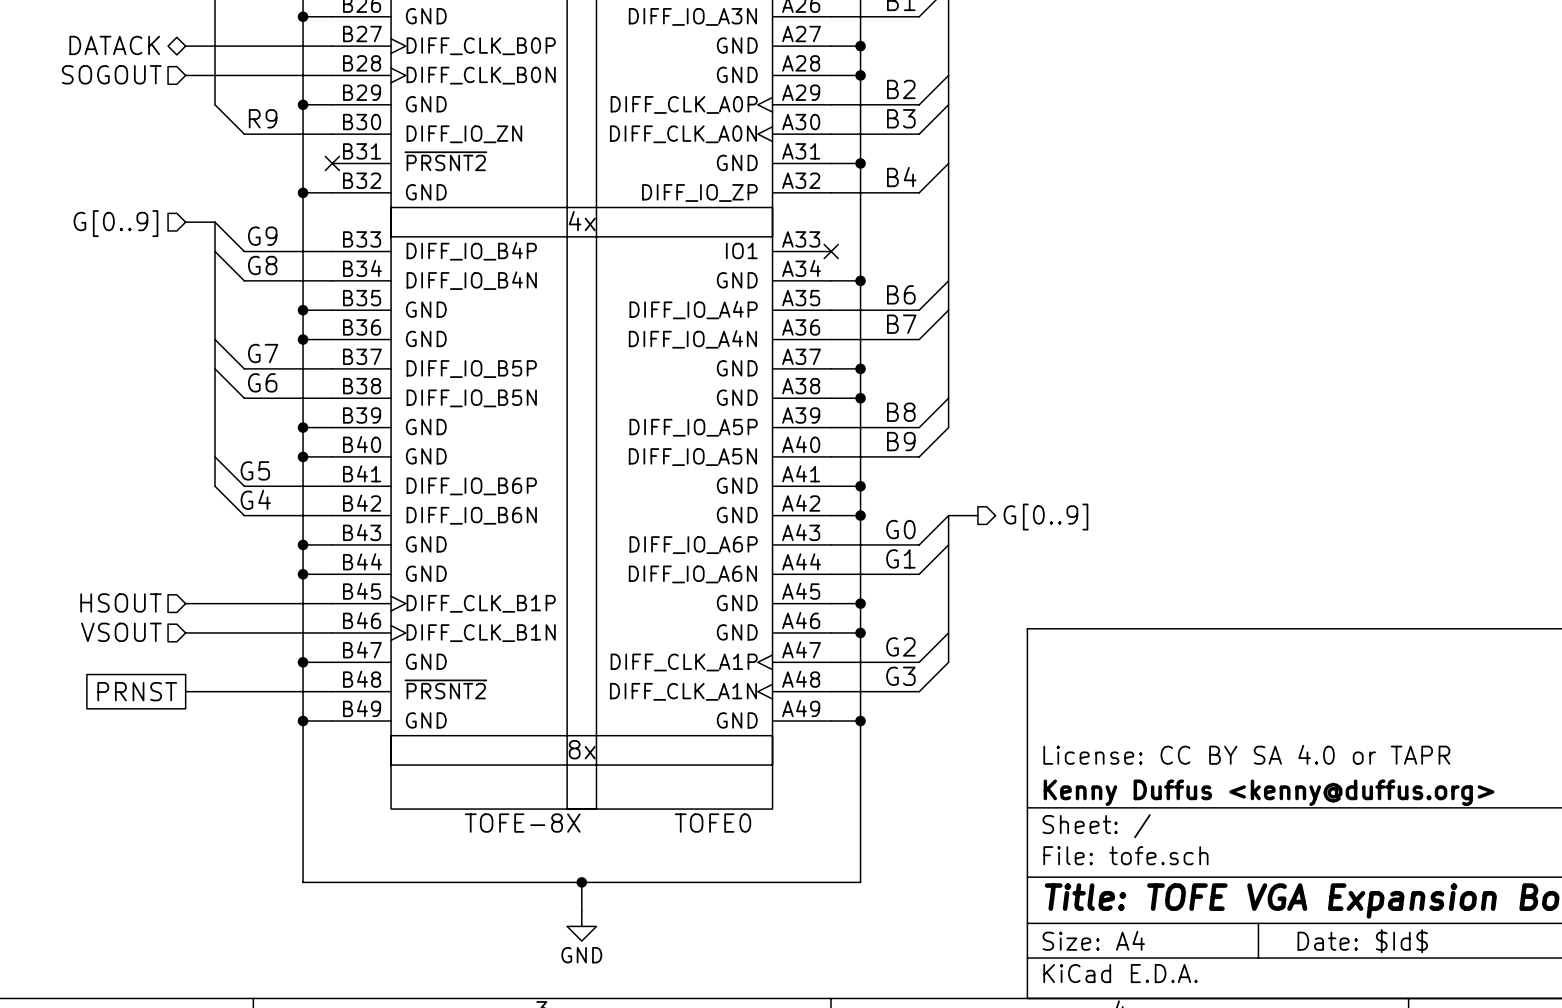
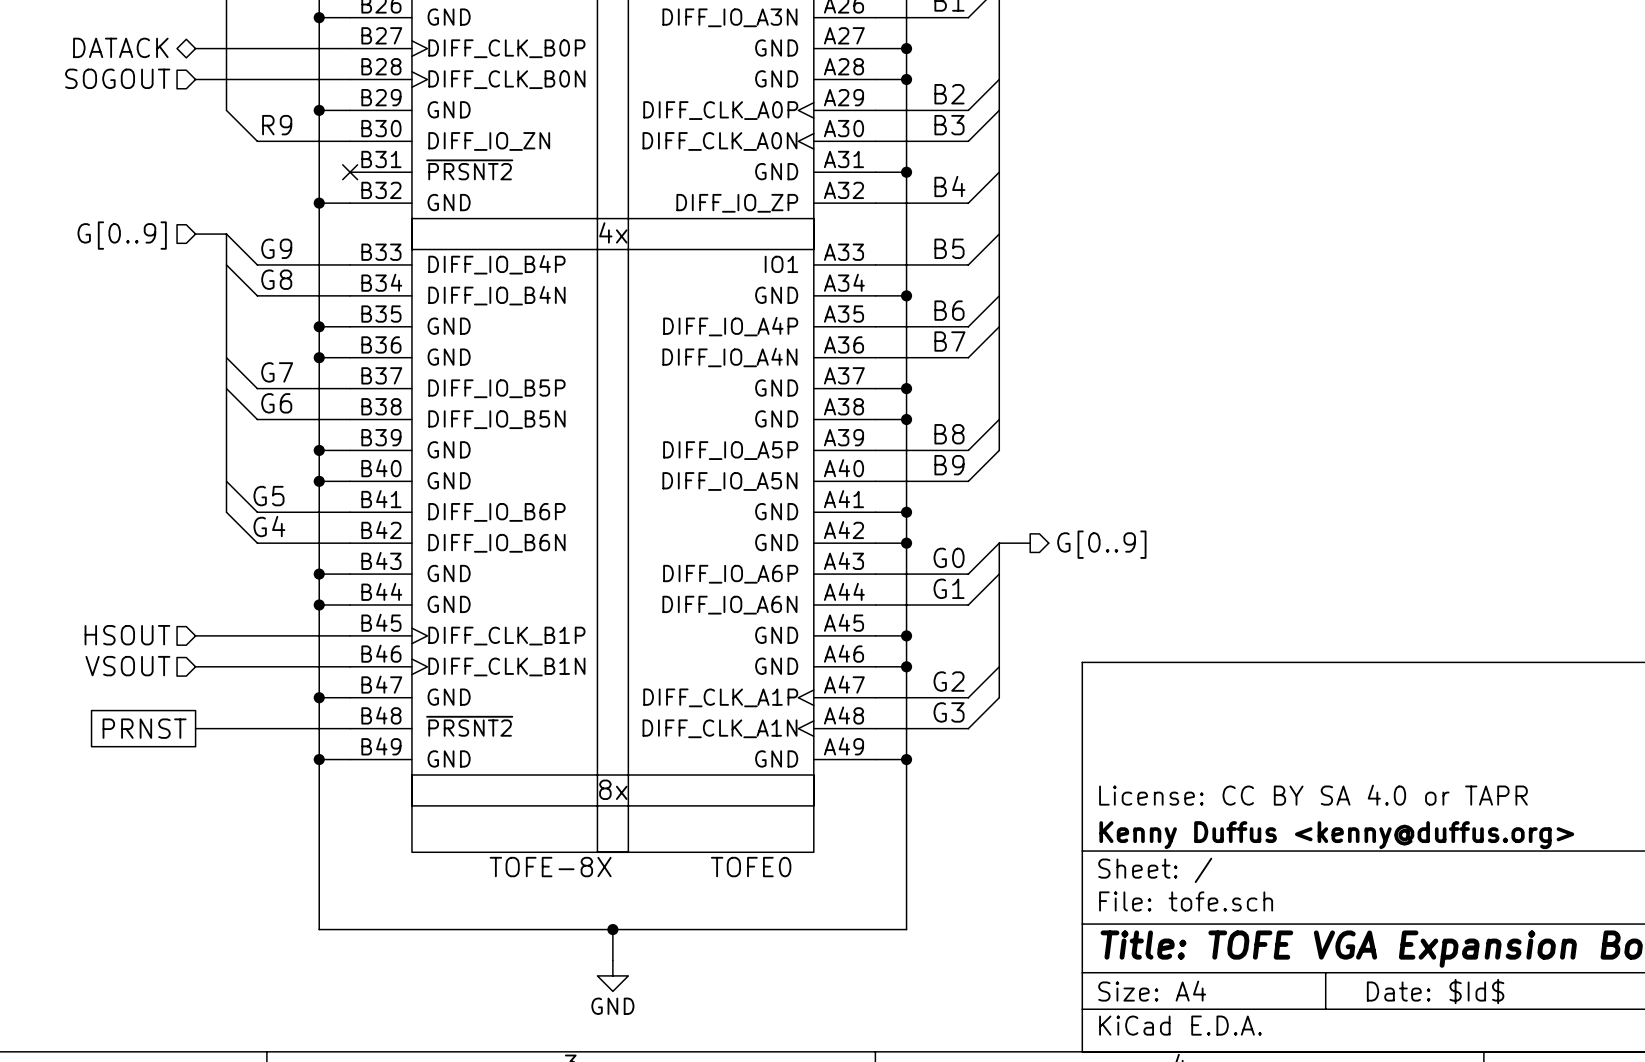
wire: none -> (999, 234) (968, 264) (875, 264)
label: none -> B5 (949, 248)
no-connect mark: (831, 251) -> none

